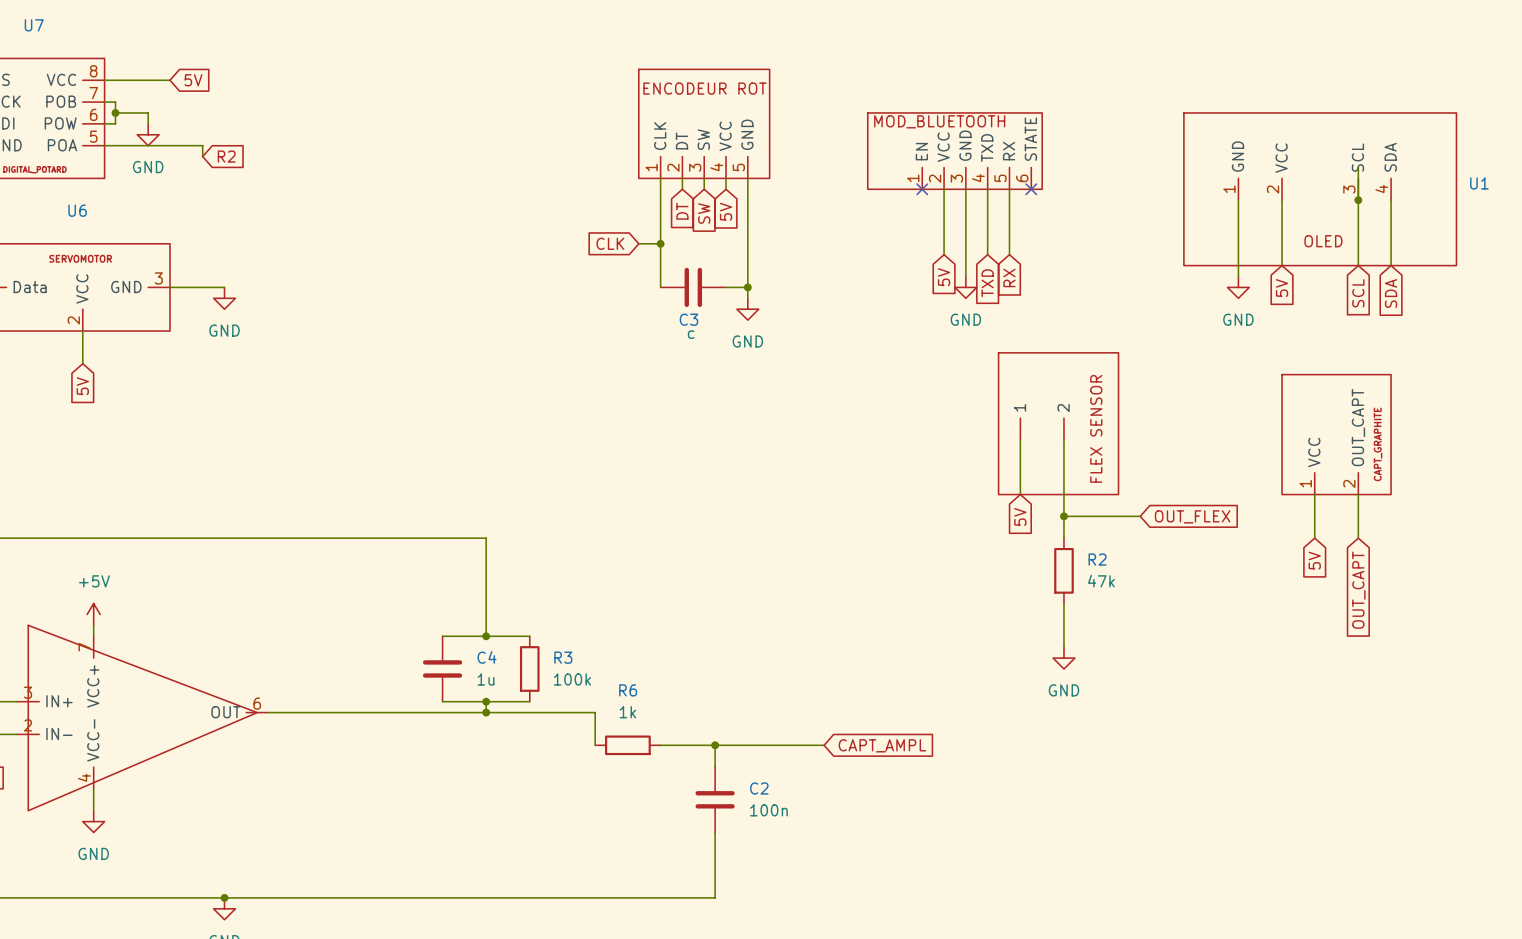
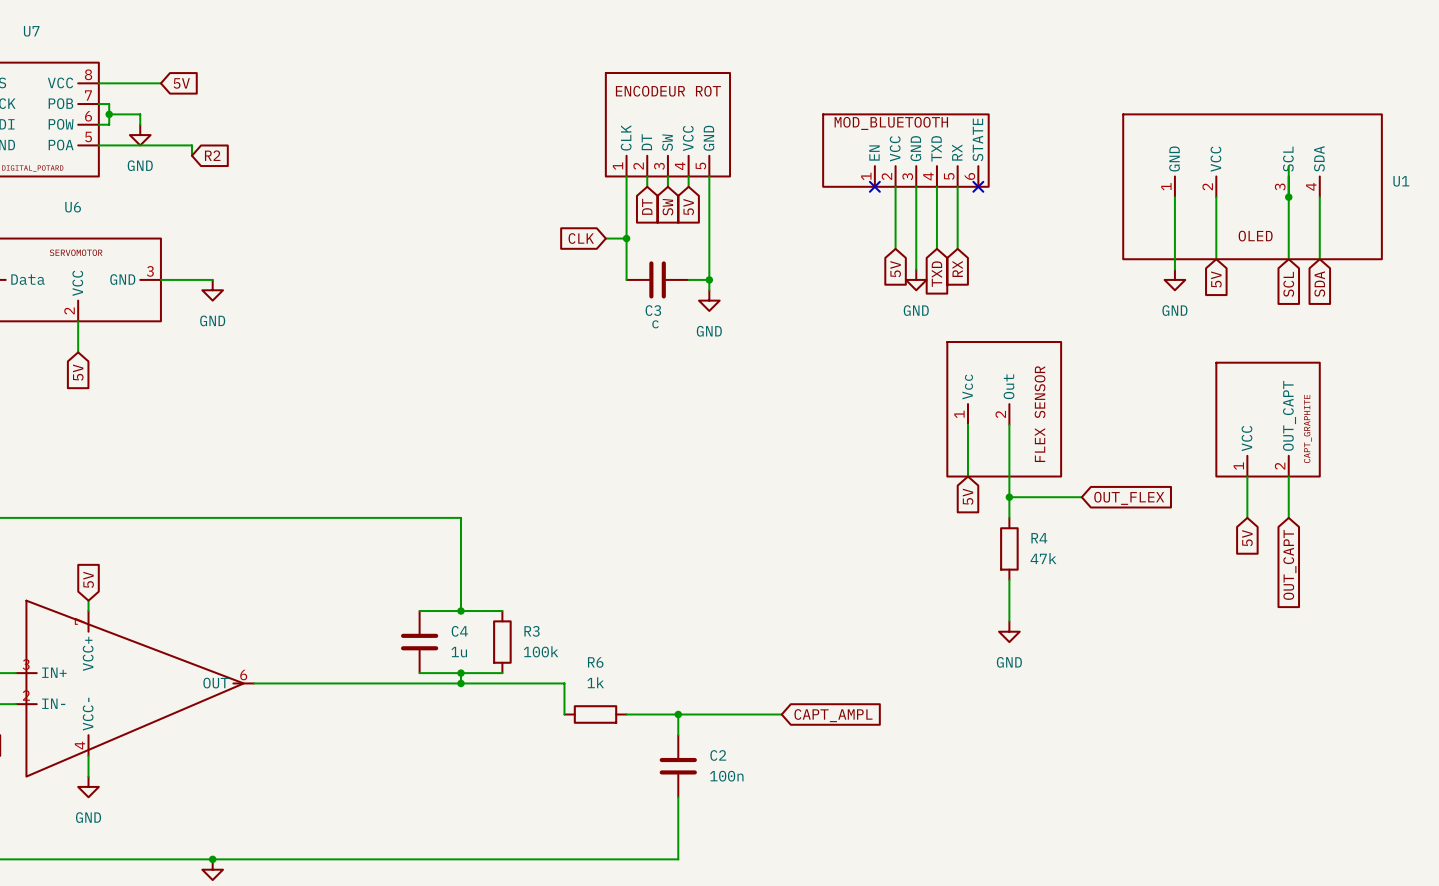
part pin name: 1 (1019, 407) -> Vcc (967, 386)
part pin name: 2 (1063, 408) -> Out (1009, 386)
part pin number: none -> 1 (959, 414)
part pin number: none -> 2 (1000, 414)
R2 name: R2 (1097, 559) -> R4 (1039, 538)
global label: none -> 5V (88, 579)
power symbol: +5V (93, 614) -> none

